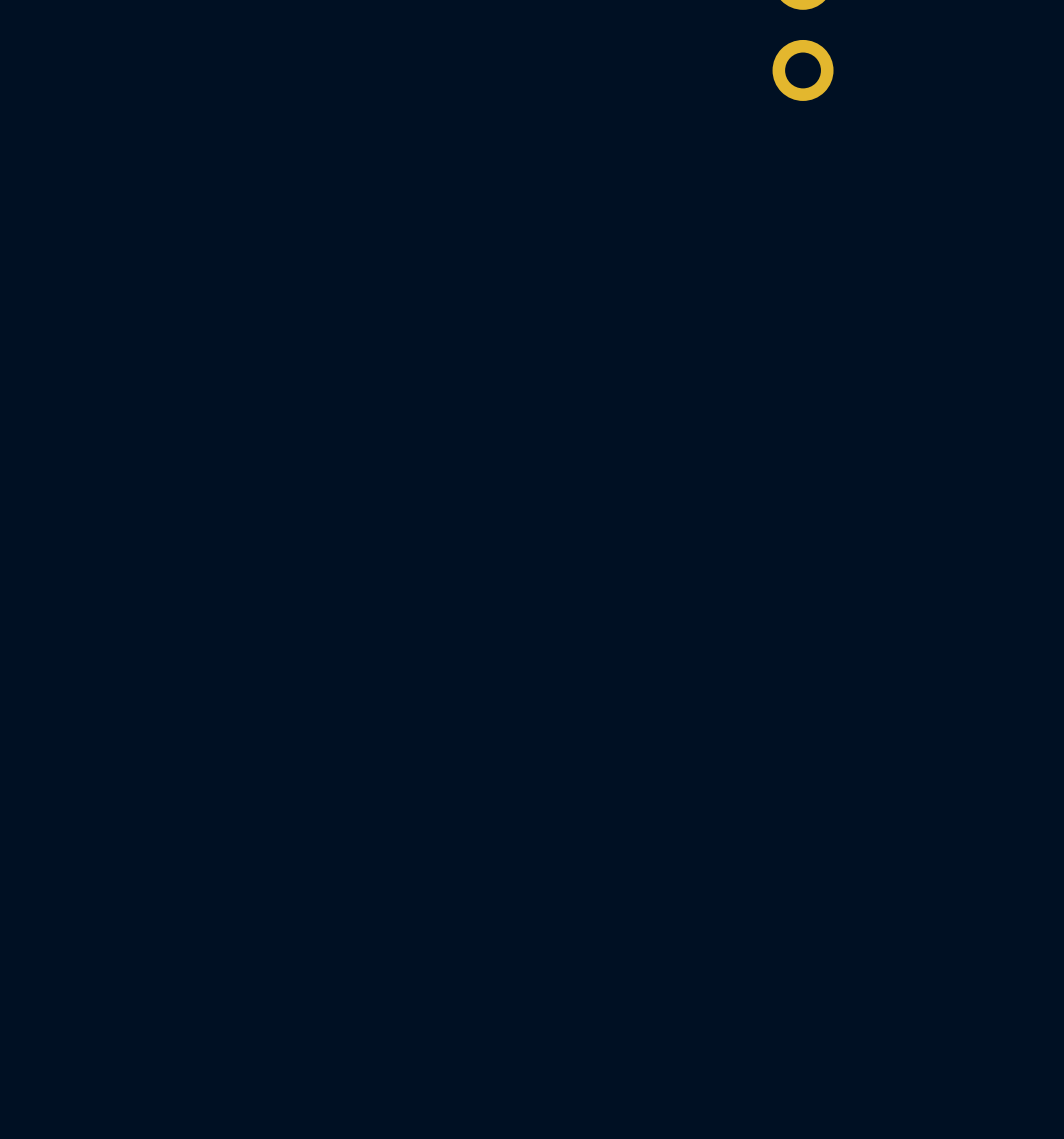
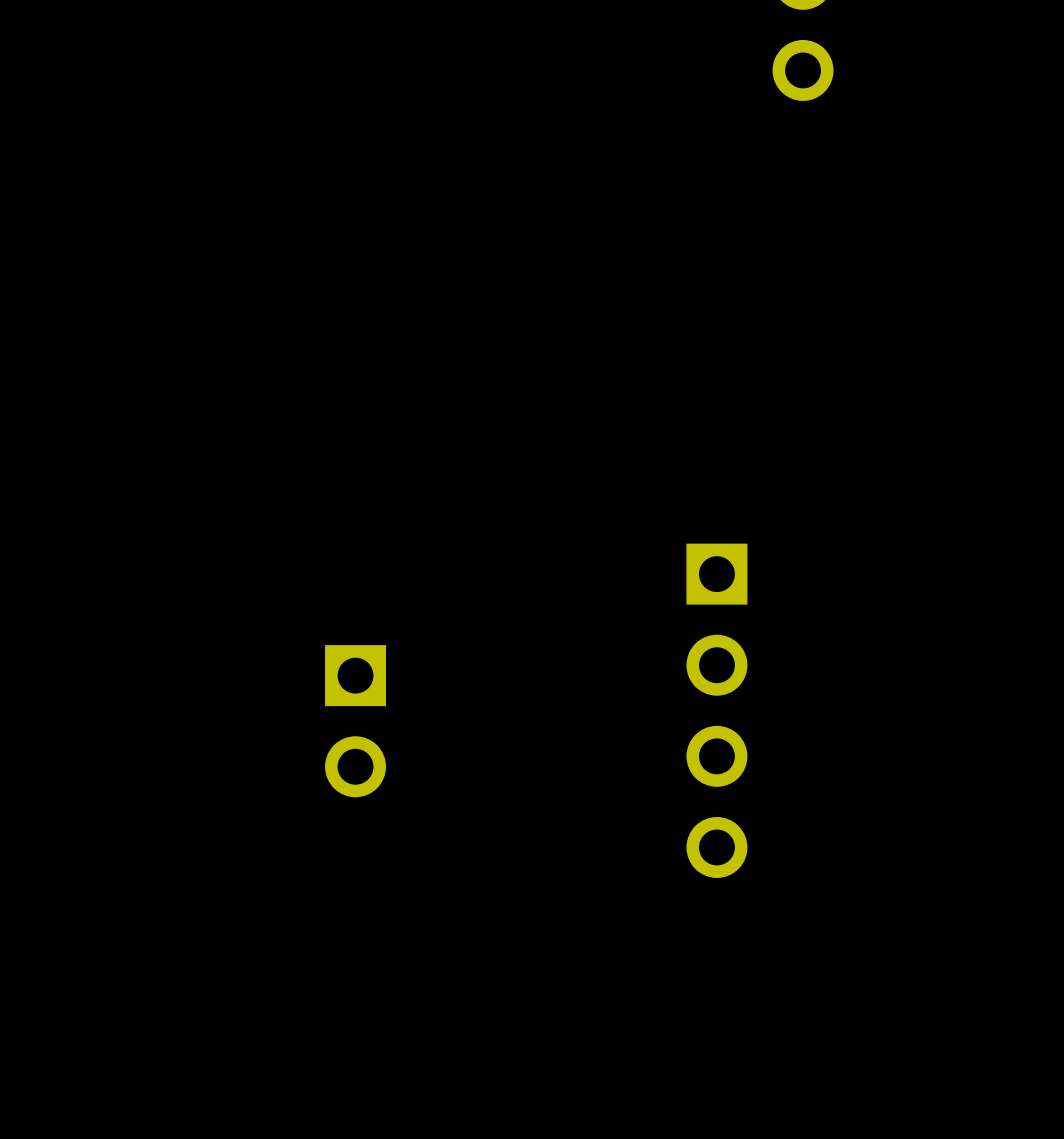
part: none -> (716, 710)
part: none -> (355, 721)

